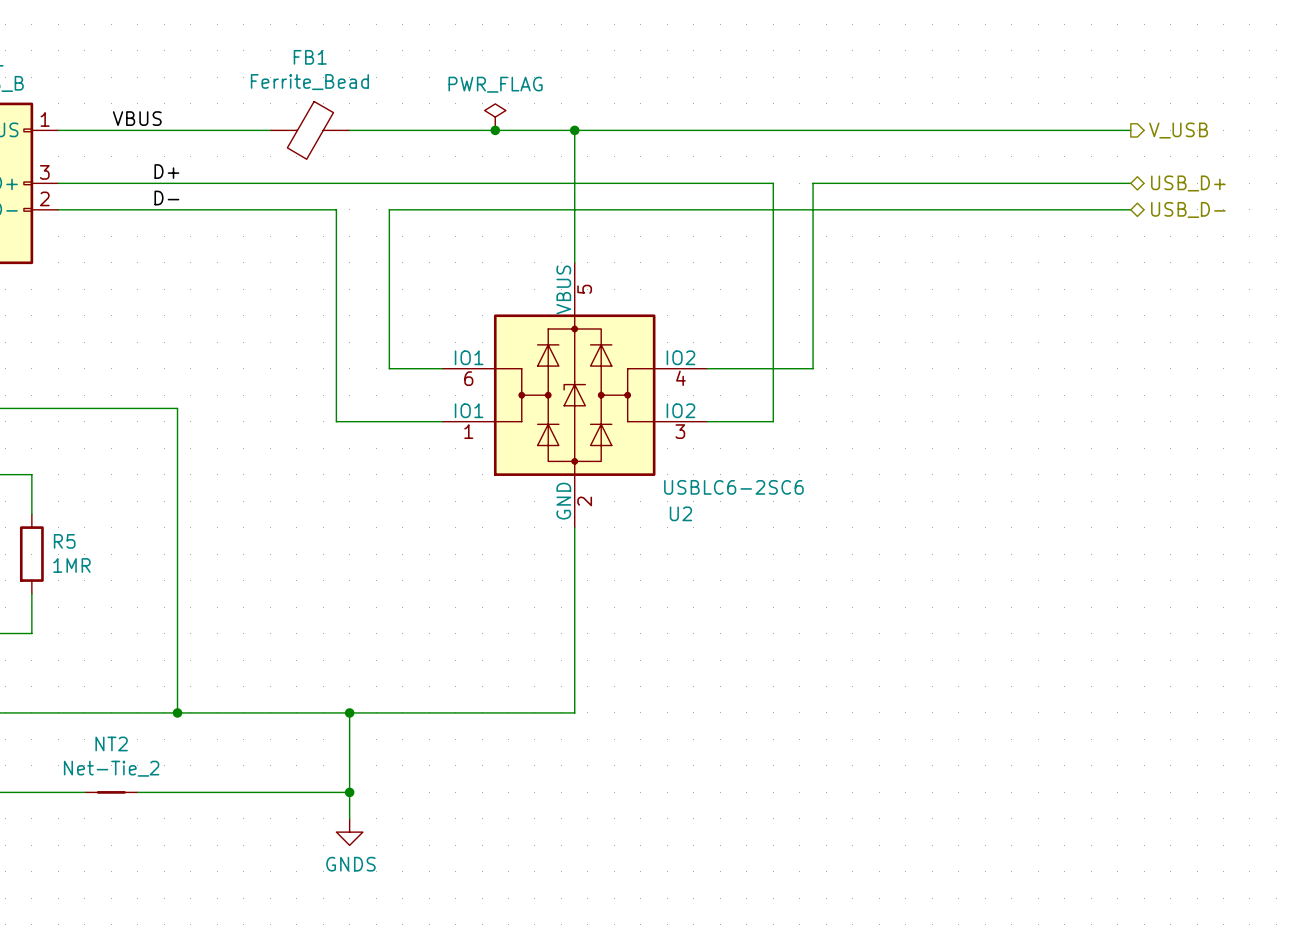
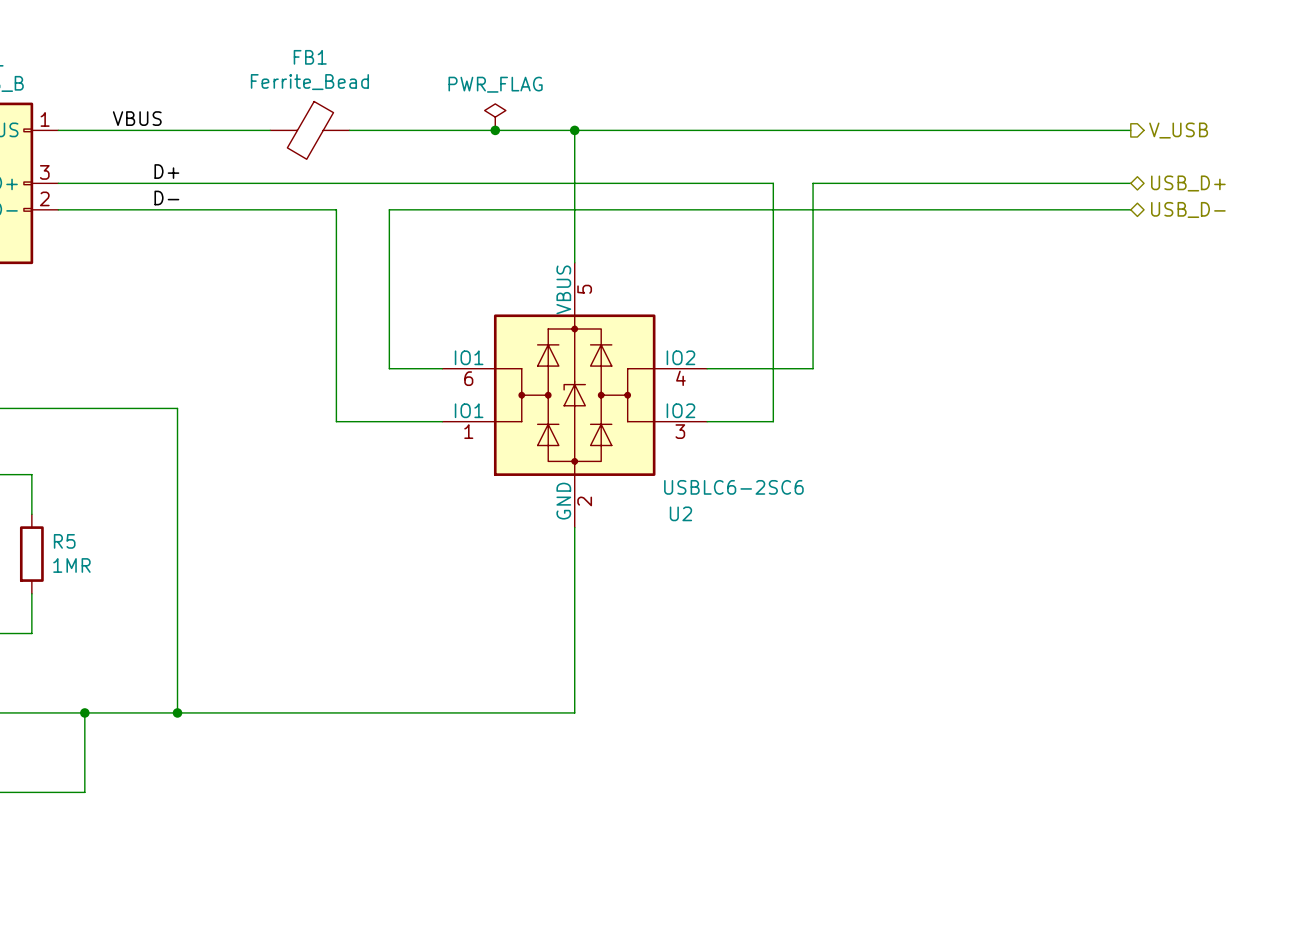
wire: none -> (84, 712) (84, 792)
junction: none -> (84, 712)
wire: (349, 712) (349, 818) -> none
junction: (349, 712) -> none
NT2: Net-Tie_2 (111, 792) -> none
wire: (137, 792) (349, 792) -> none
junction: (349, 792) -> none
power symbol: GNDS (349, 832) -> none

